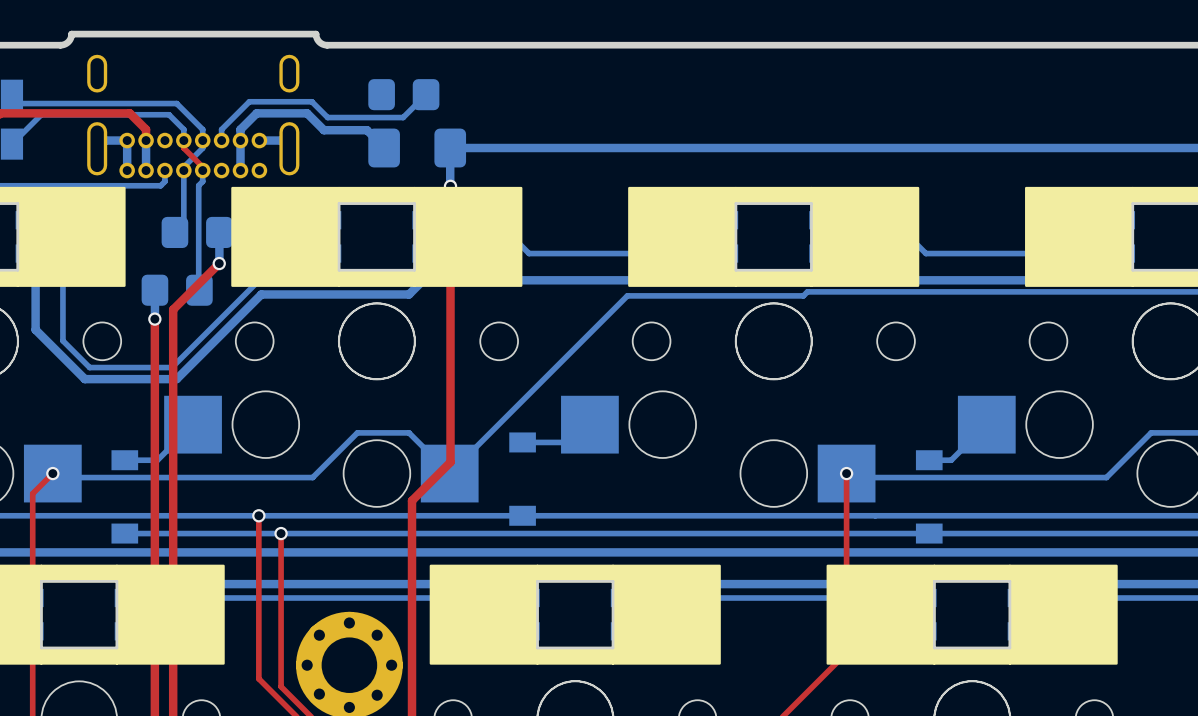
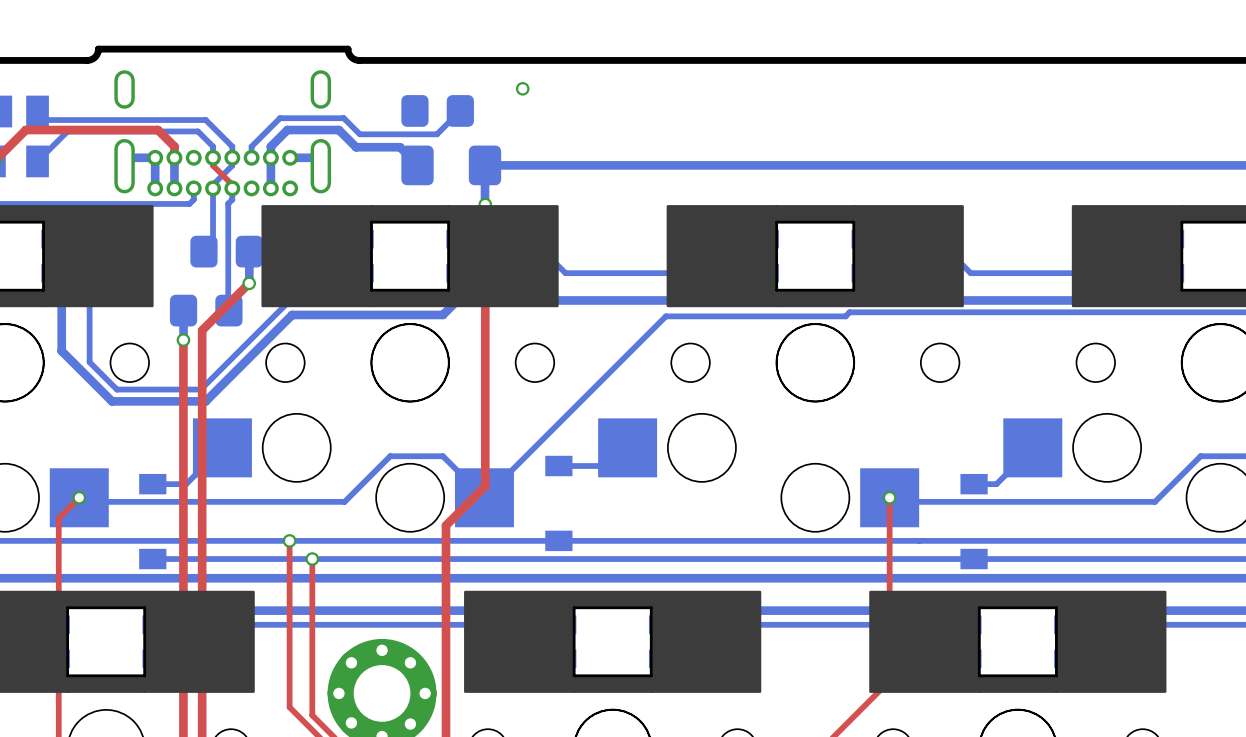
via: none -> (522, 88)

